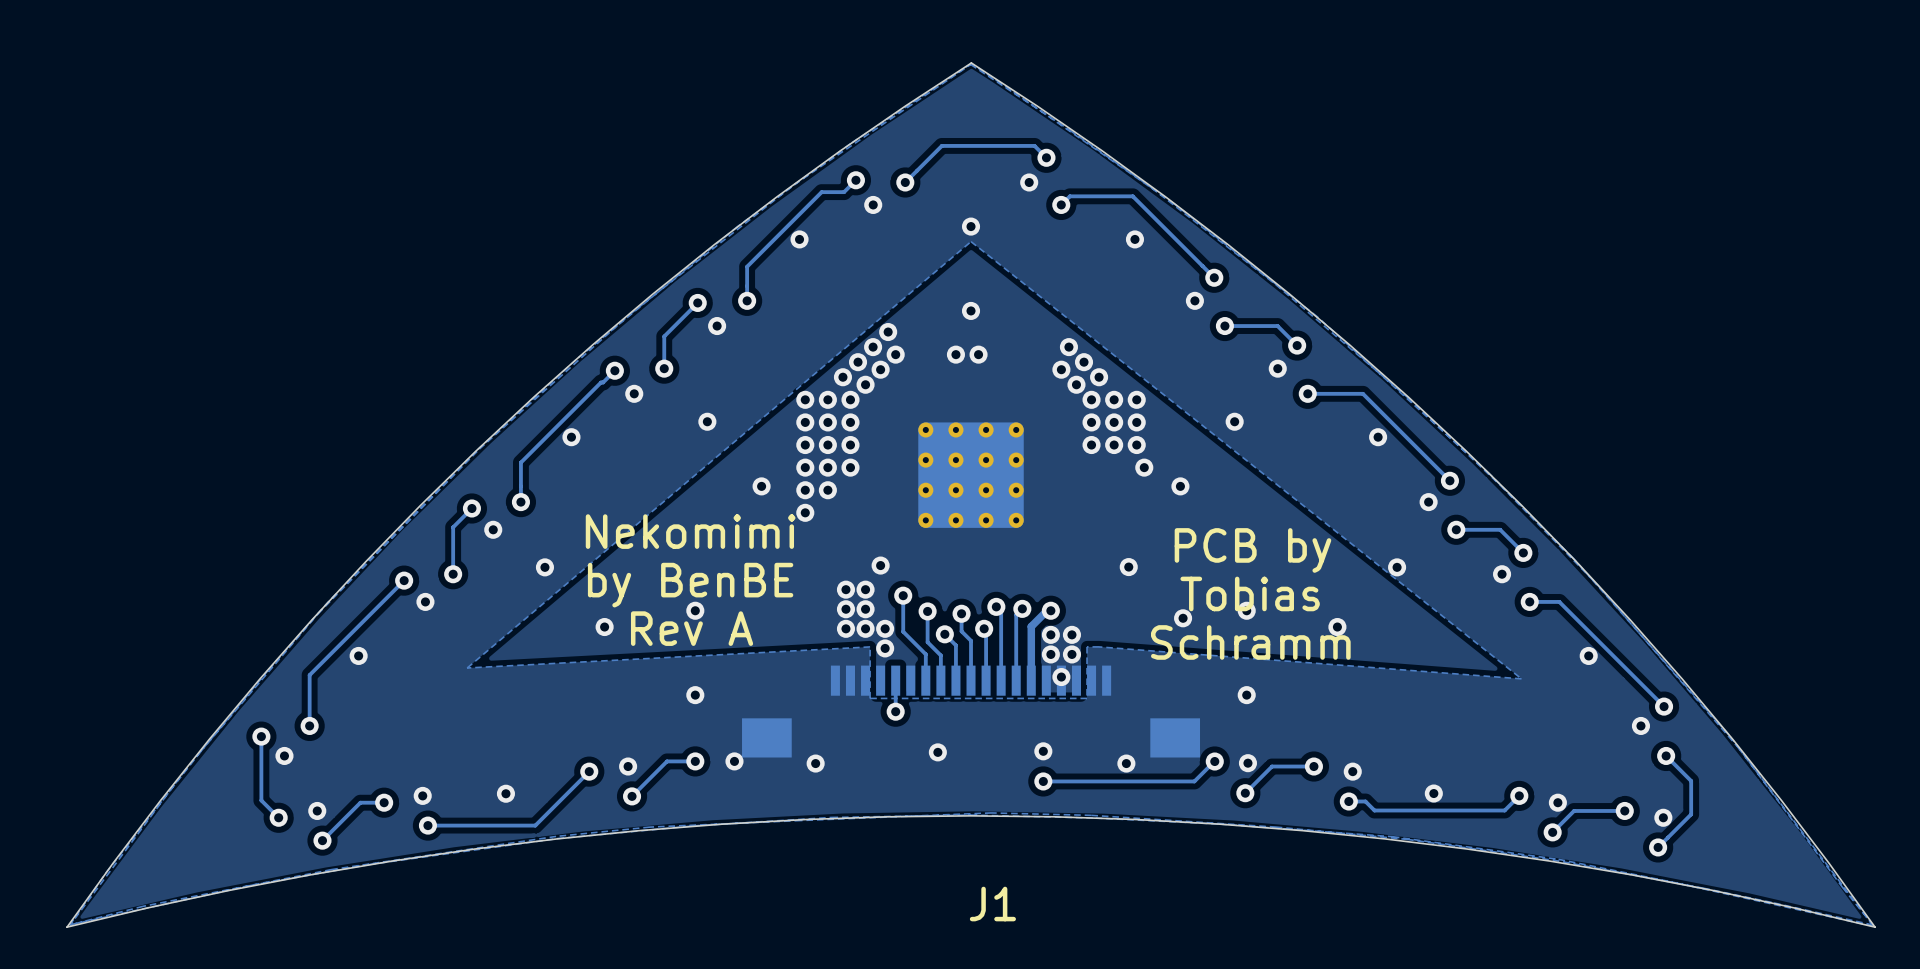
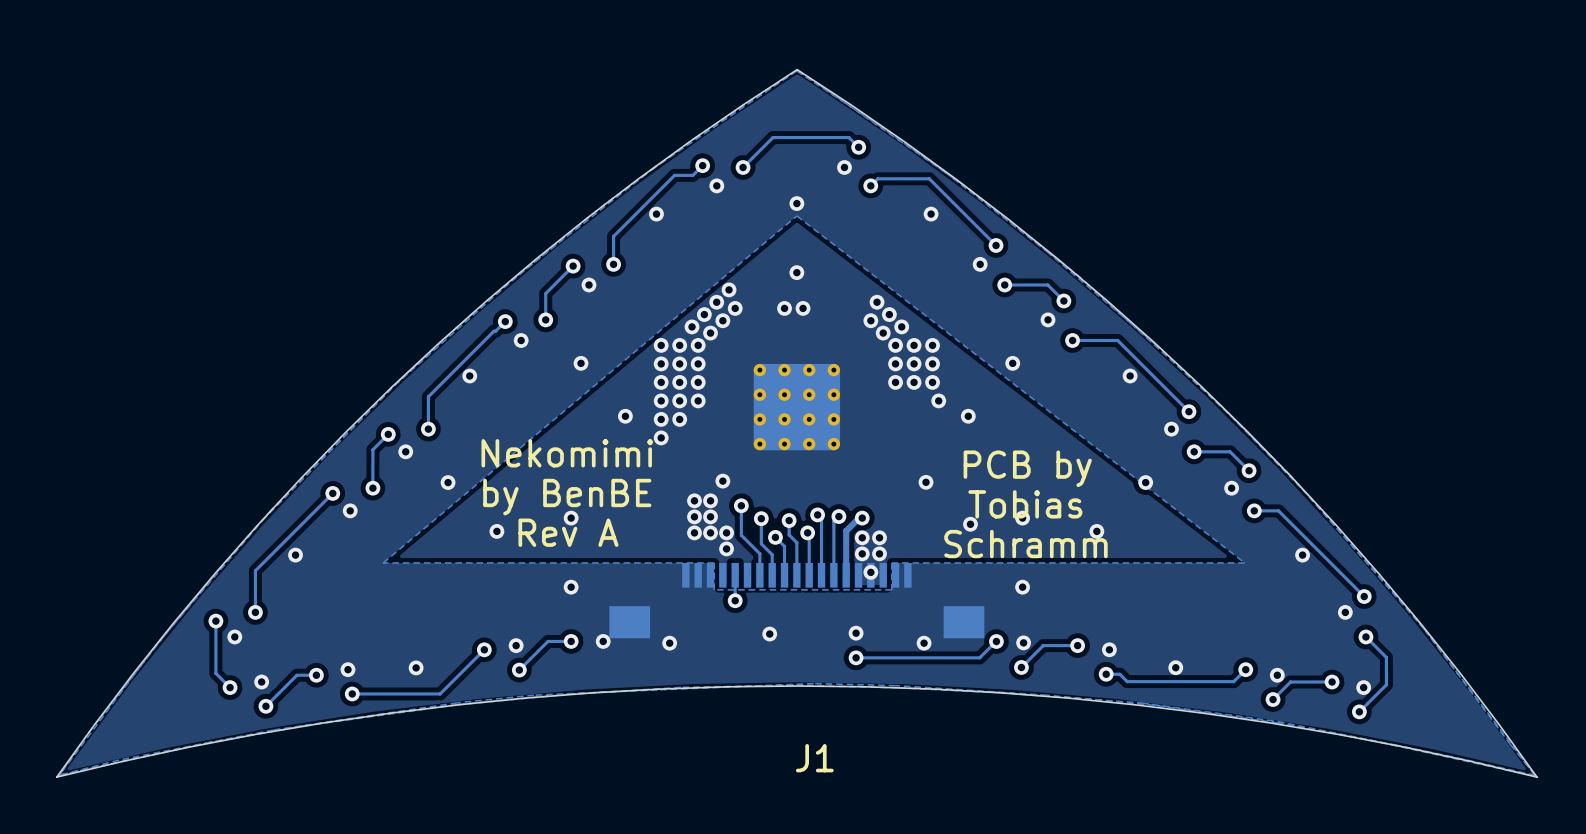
zone outline: (1087, 665) (1087, 646) (1099, 646) (1521, 678) (971, 241) (467, 668) (870, 646) (870, 665) -> (891, 562) (1244, 562) (796, 215) (383, 562) (714, 562)

